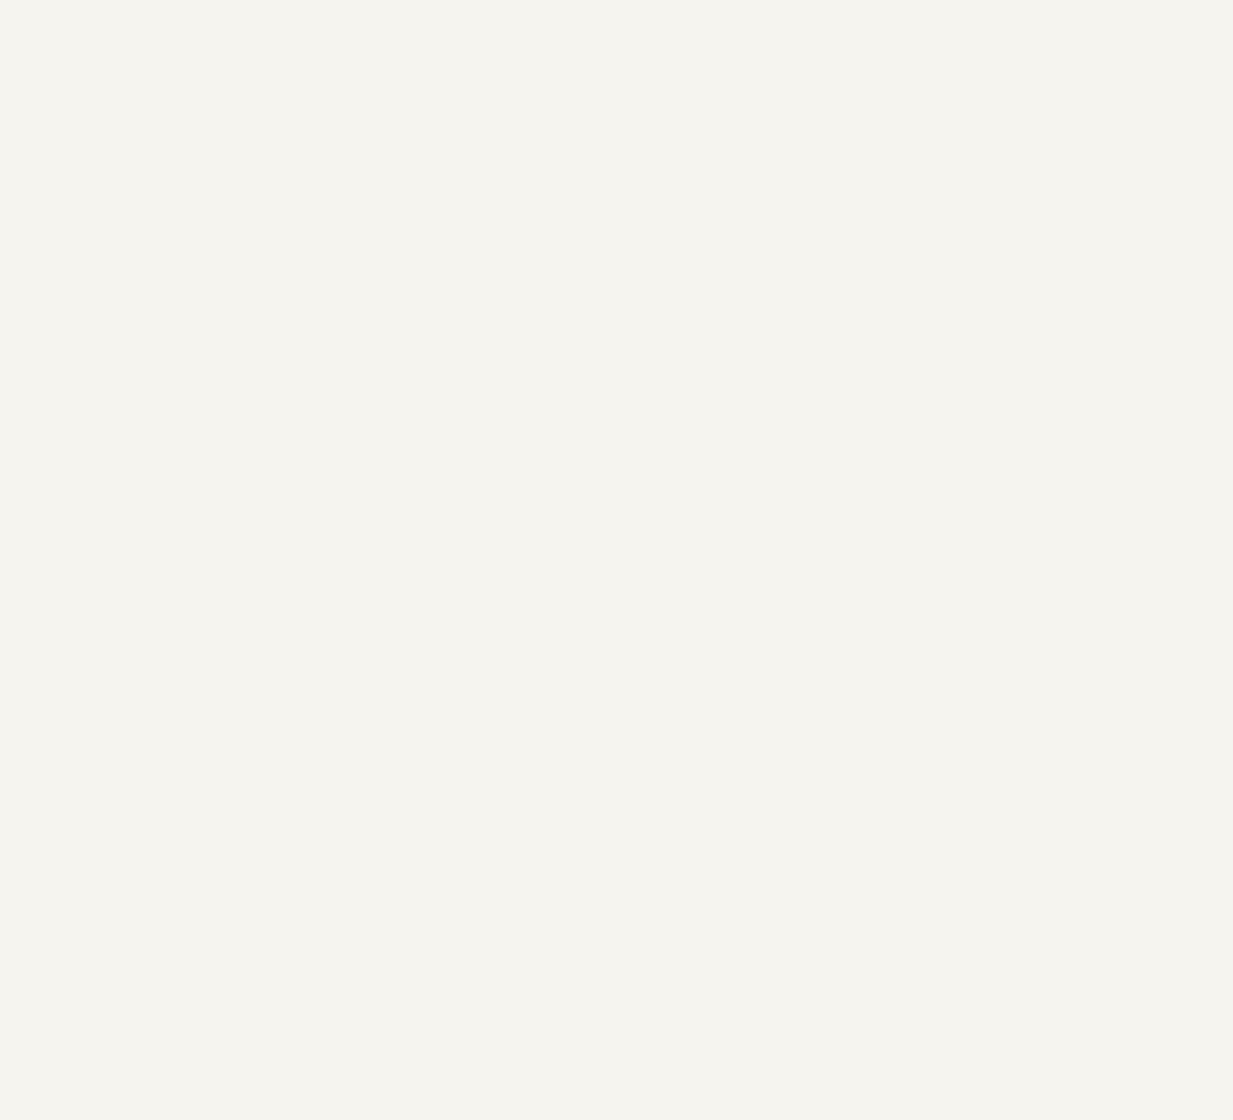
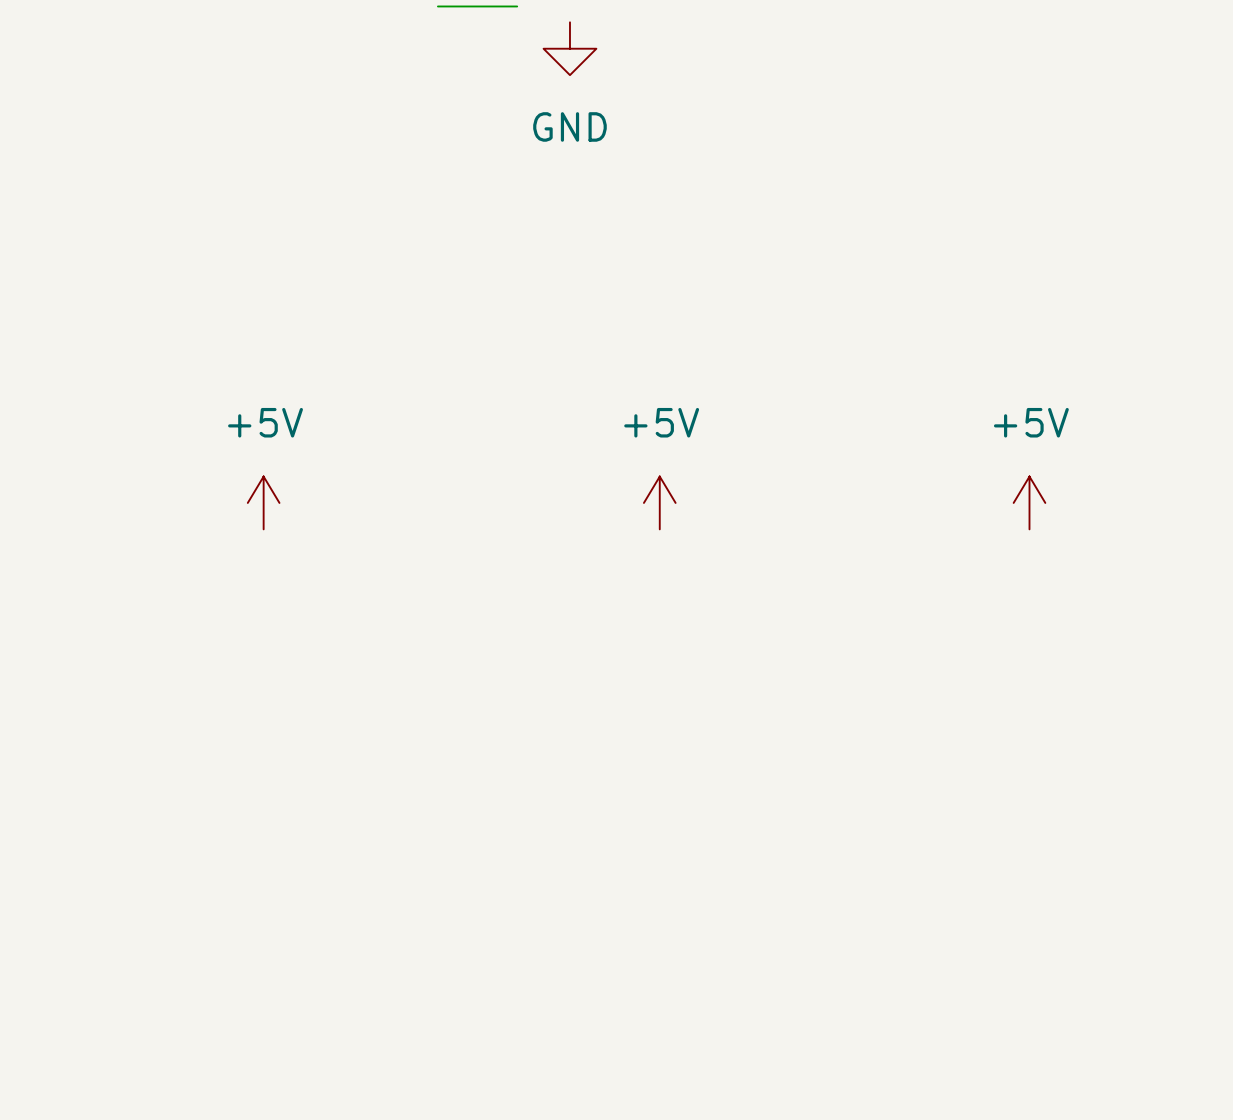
wire: none -> (437, 6) (517, 6)
power symbol: none -> GND (569, 48)
power symbol: none -> +5V (263, 502)
power symbol: none -> +5V (659, 502)
power symbol: none -> +5V (1029, 502)

